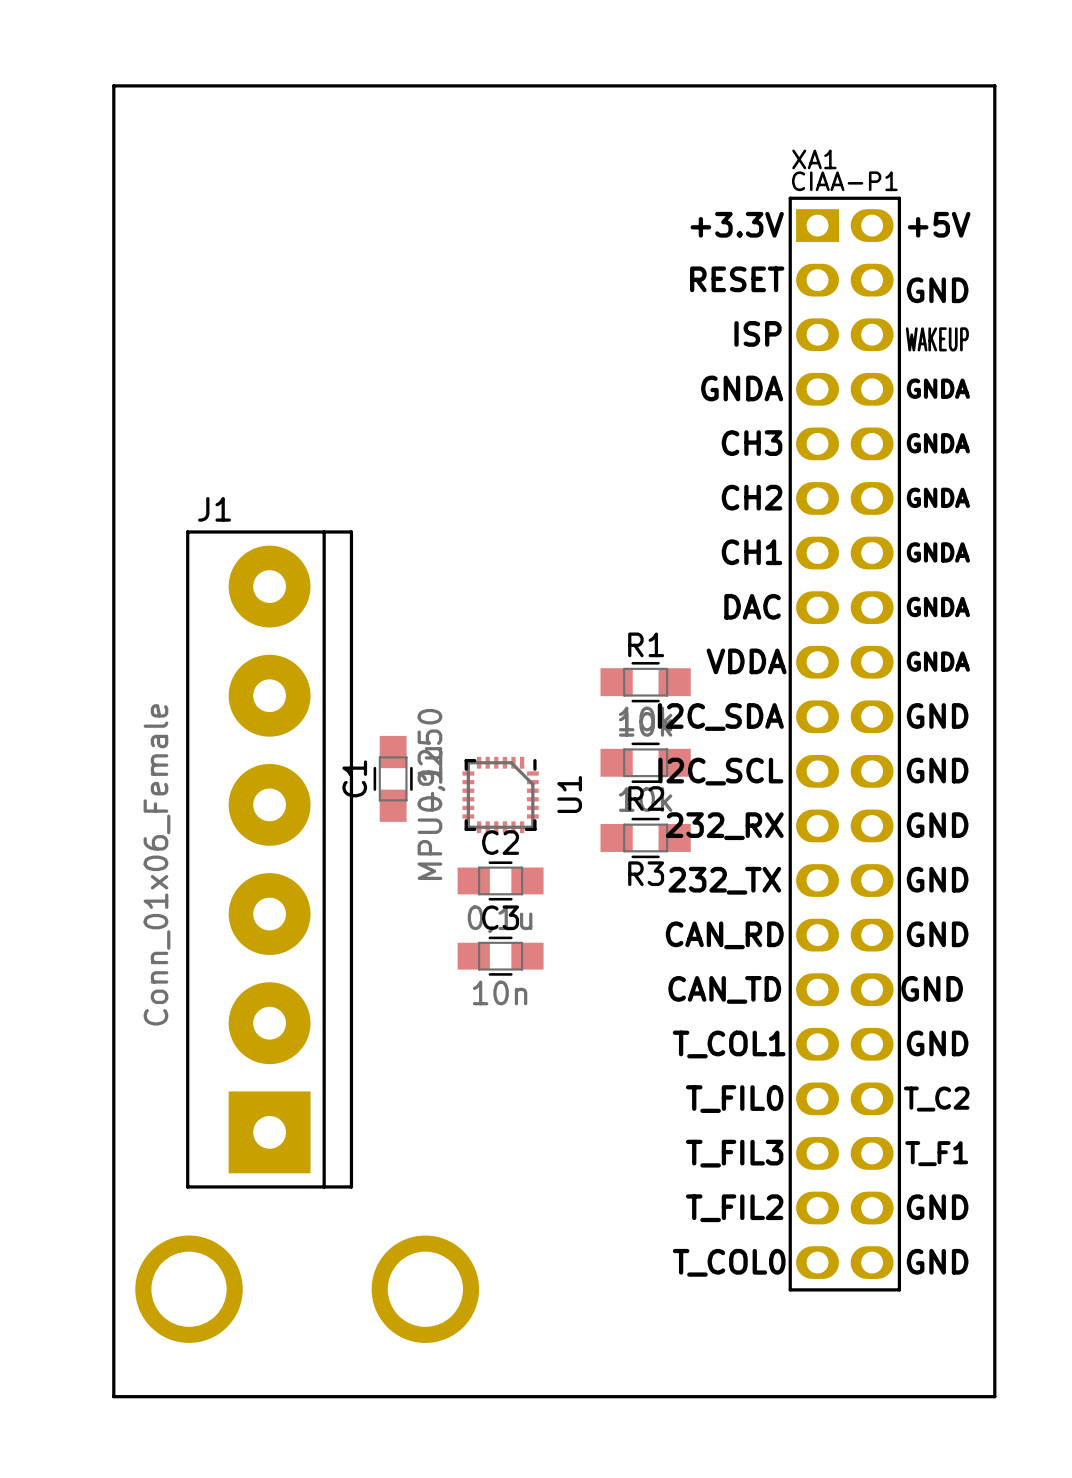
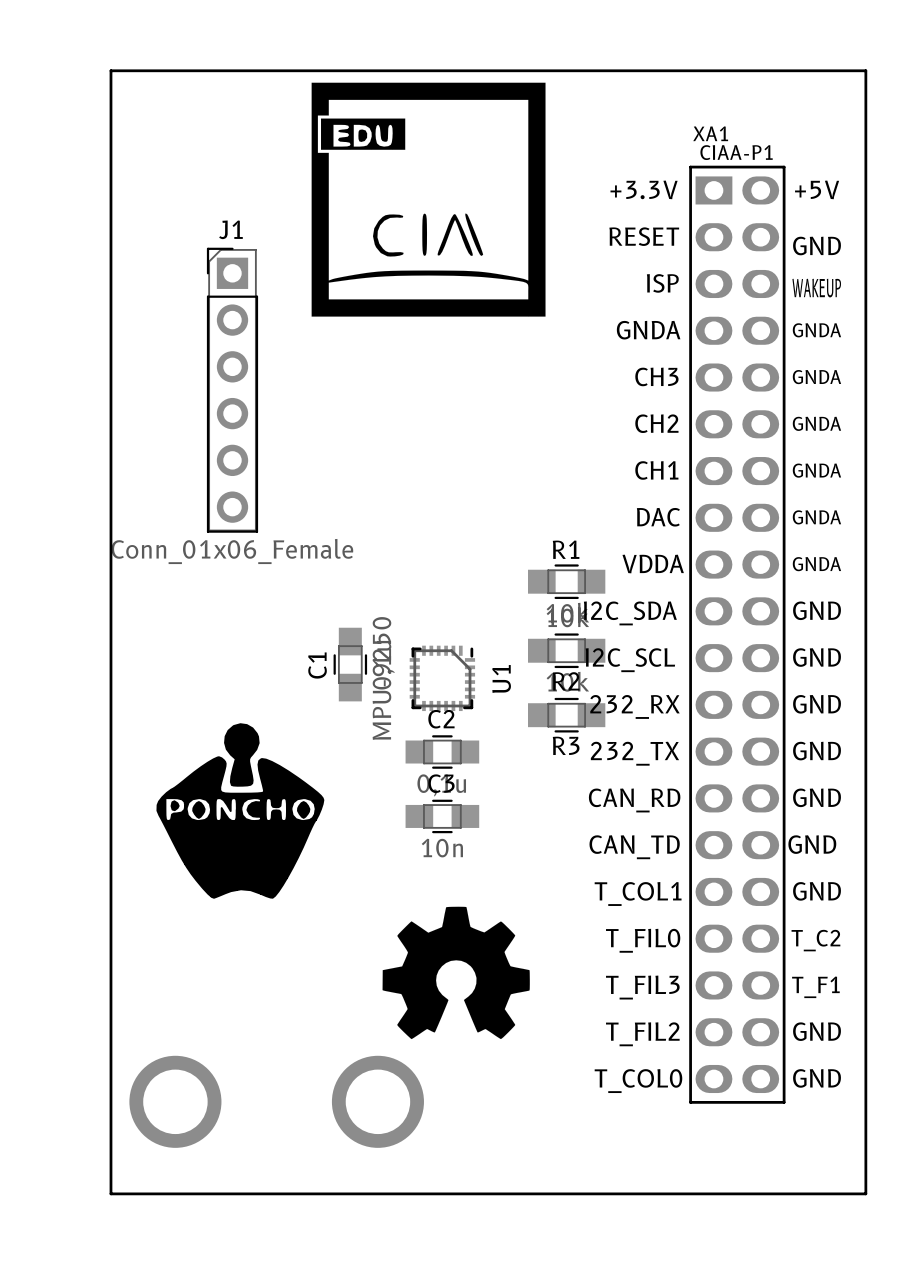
drawing: none -> [311, 82, 546, 317]
J1 name position: J1 (214, 509) -> J1 (230, 229)
J1 footprint: [186, 530, 354, 1189] -> [206, 247, 259, 533]
drawing: none -> [156, 723, 325, 899]
J1 value position: Conn_01x06_Female (156, 864) -> Conn_01x06_Female (232, 551)
drawing: none -> [382, 906, 530, 1040]

